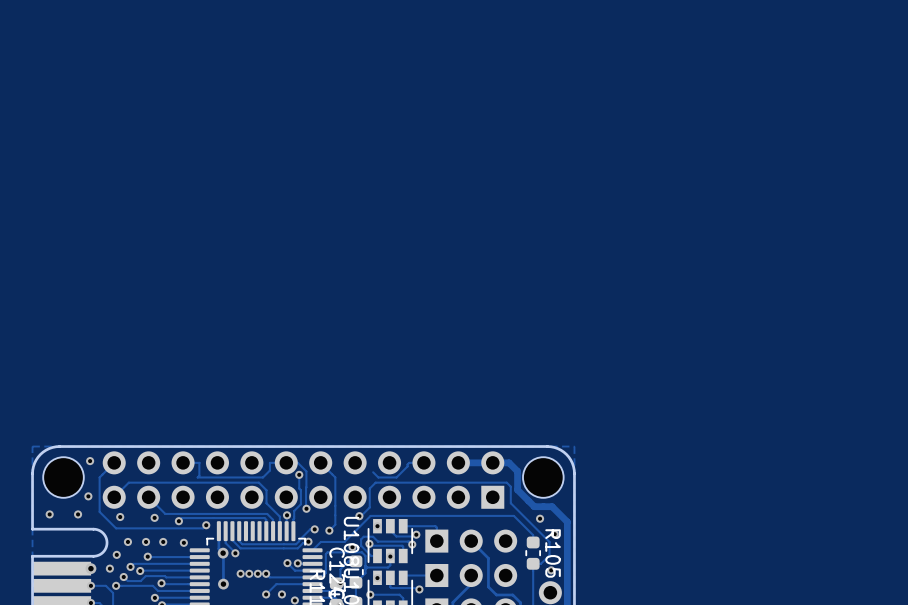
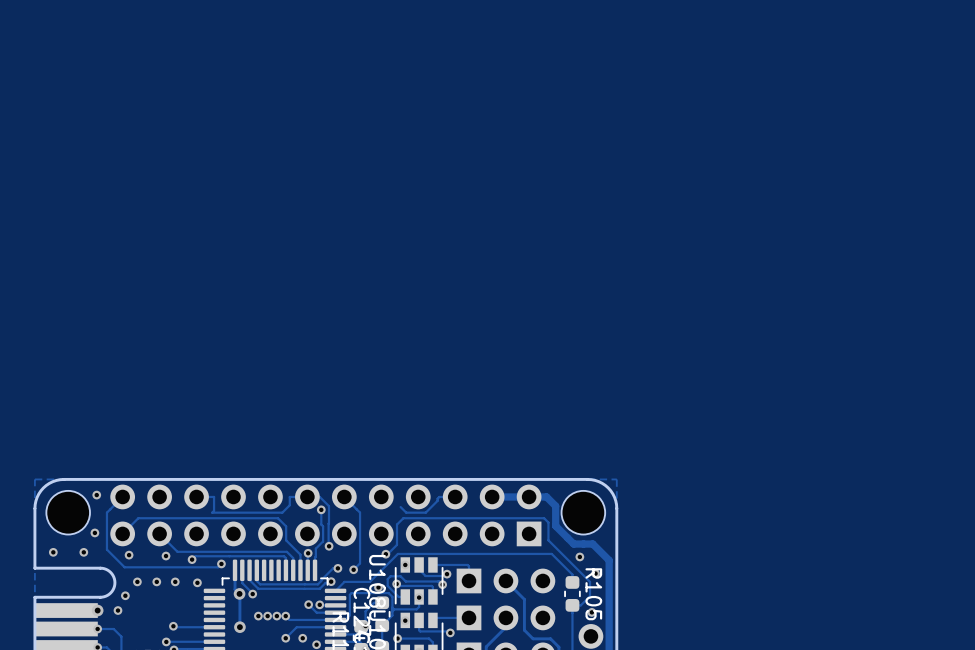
track: (147, 556) (199, 557) -> none
via: (147, 556) -> none
track: (199, 563) (133, 563) (130, 566) -> none
via: (130, 566) -> none
track: (199, 570) (140, 571) -> none
via: (140, 571) -> none
track: (123, 577) (127, 581) (140, 581) (145, 576) (199, 577) -> none
via: (123, 577) -> none
track: (116, 585) (152, 585) (158, 590) (199, 590) -> none
via: (116, 585) -> none

